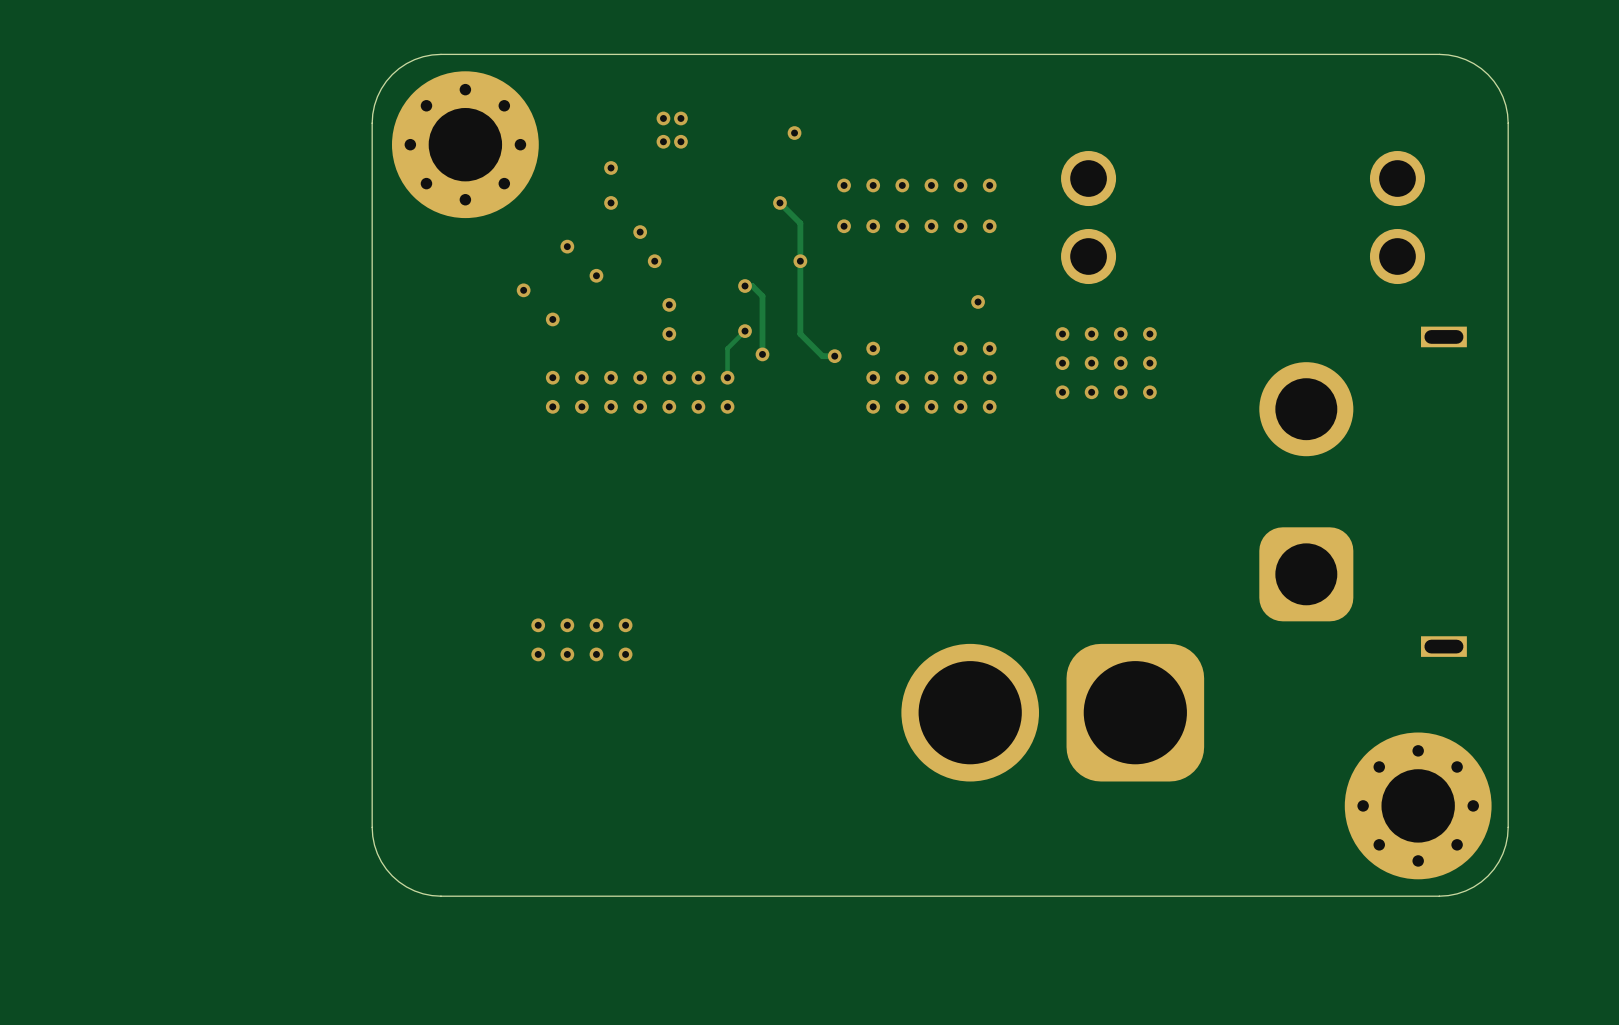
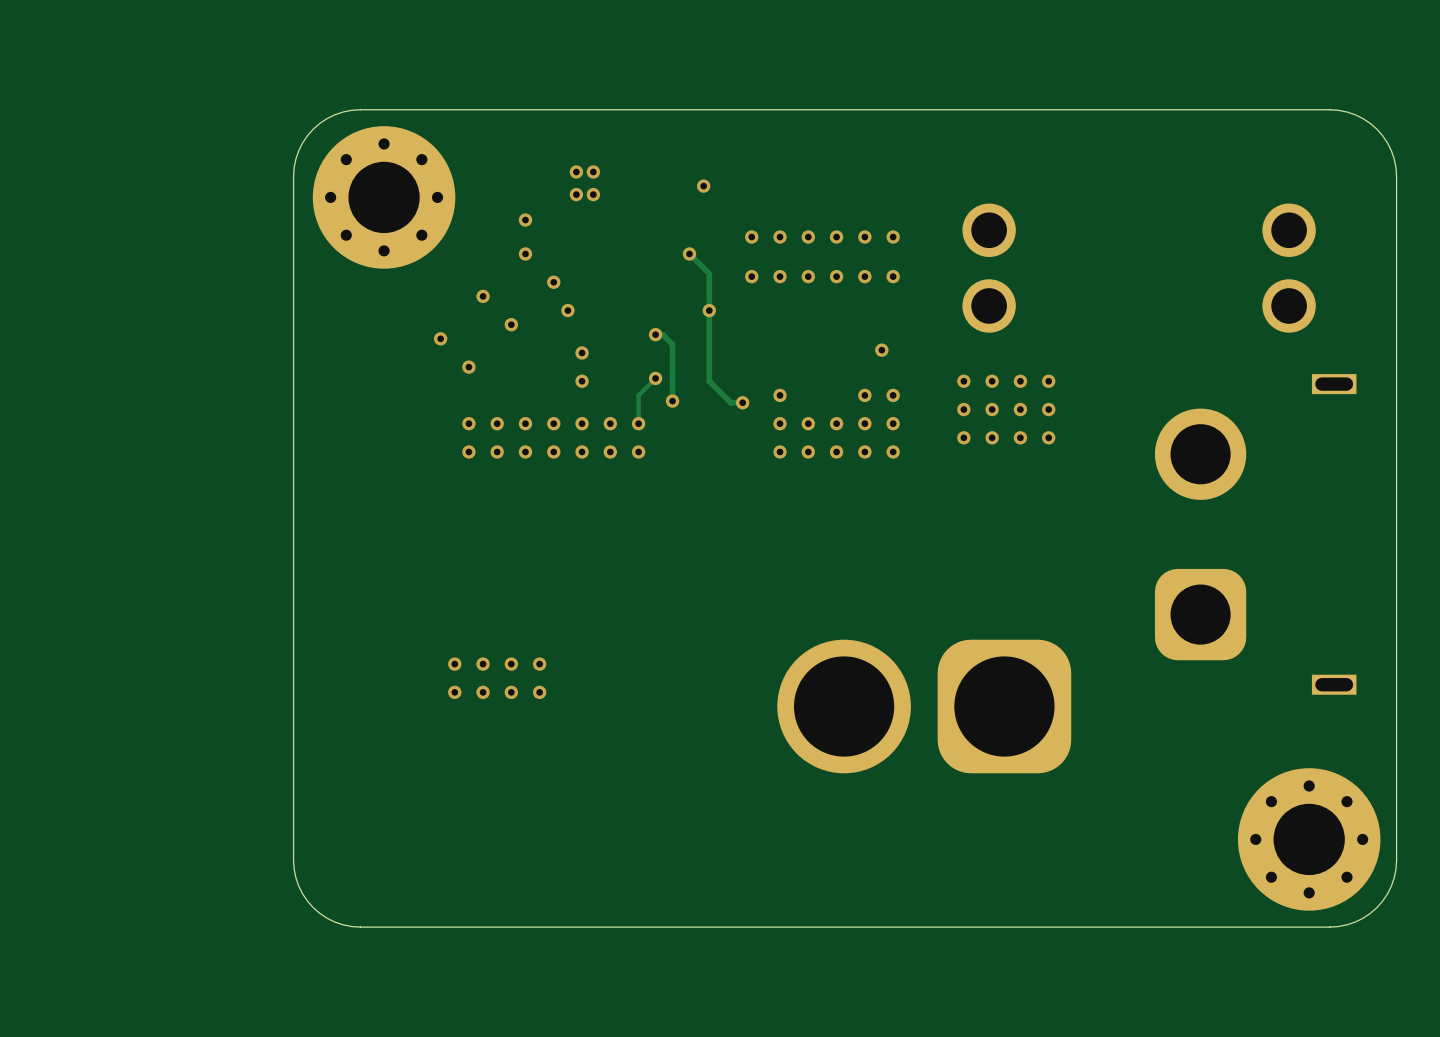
part position: (1052, 712) -> (924, 706)

